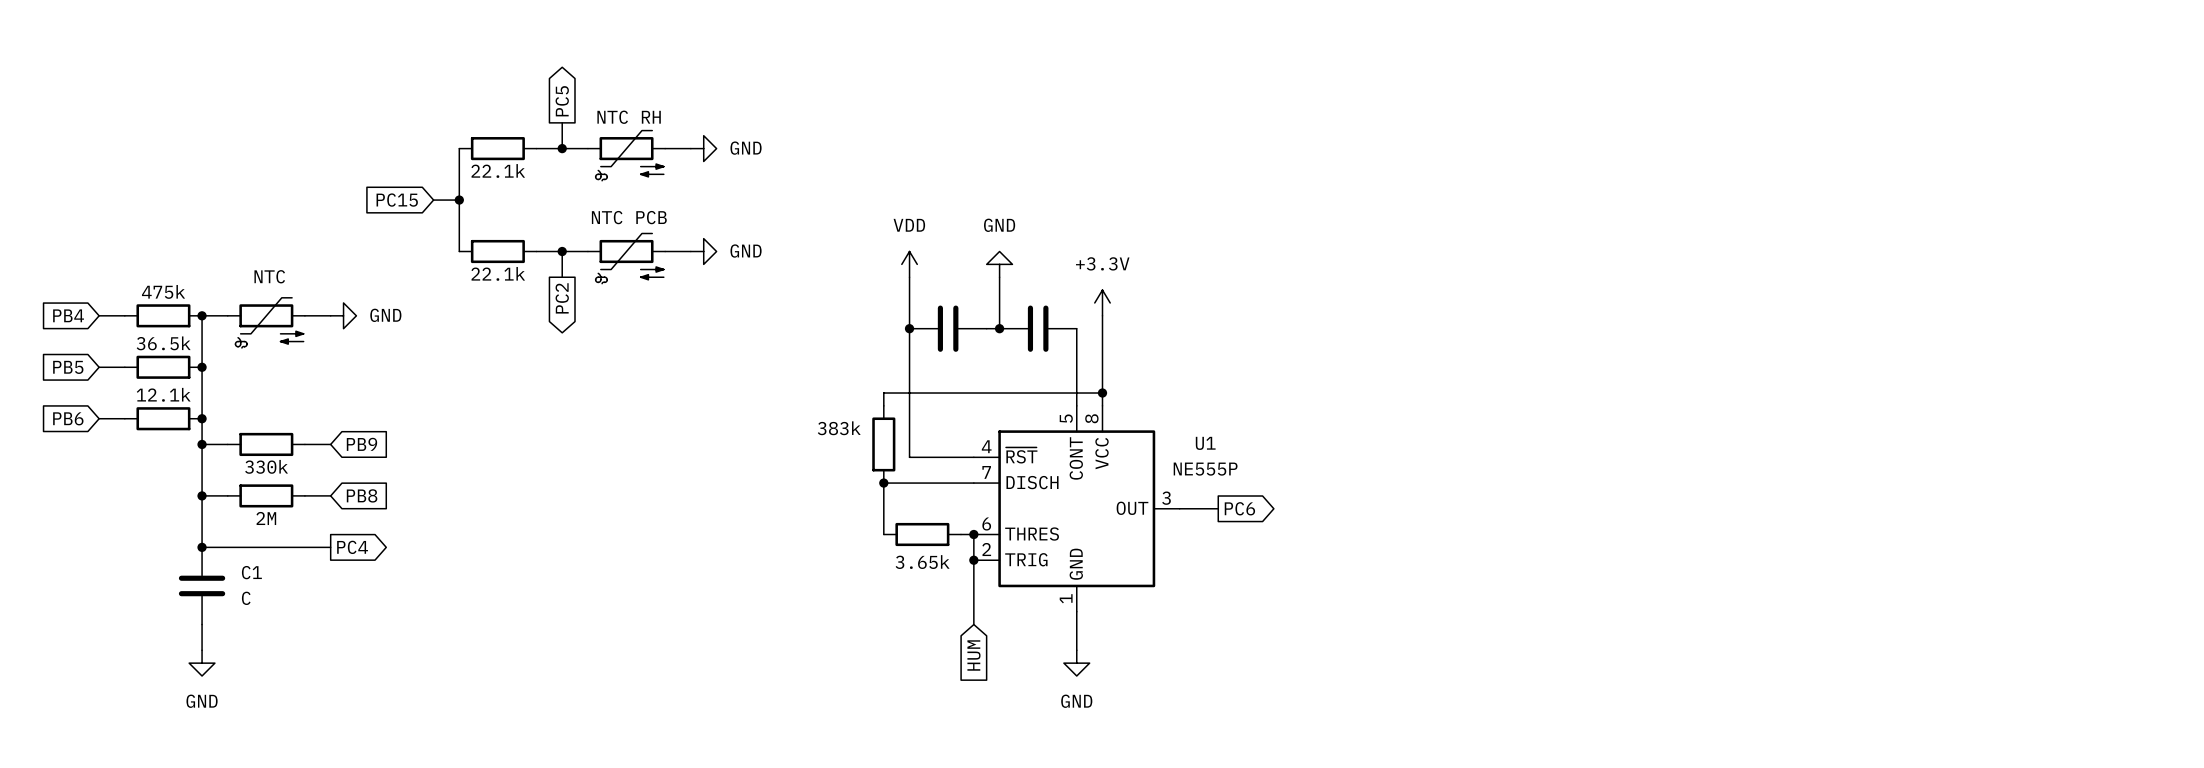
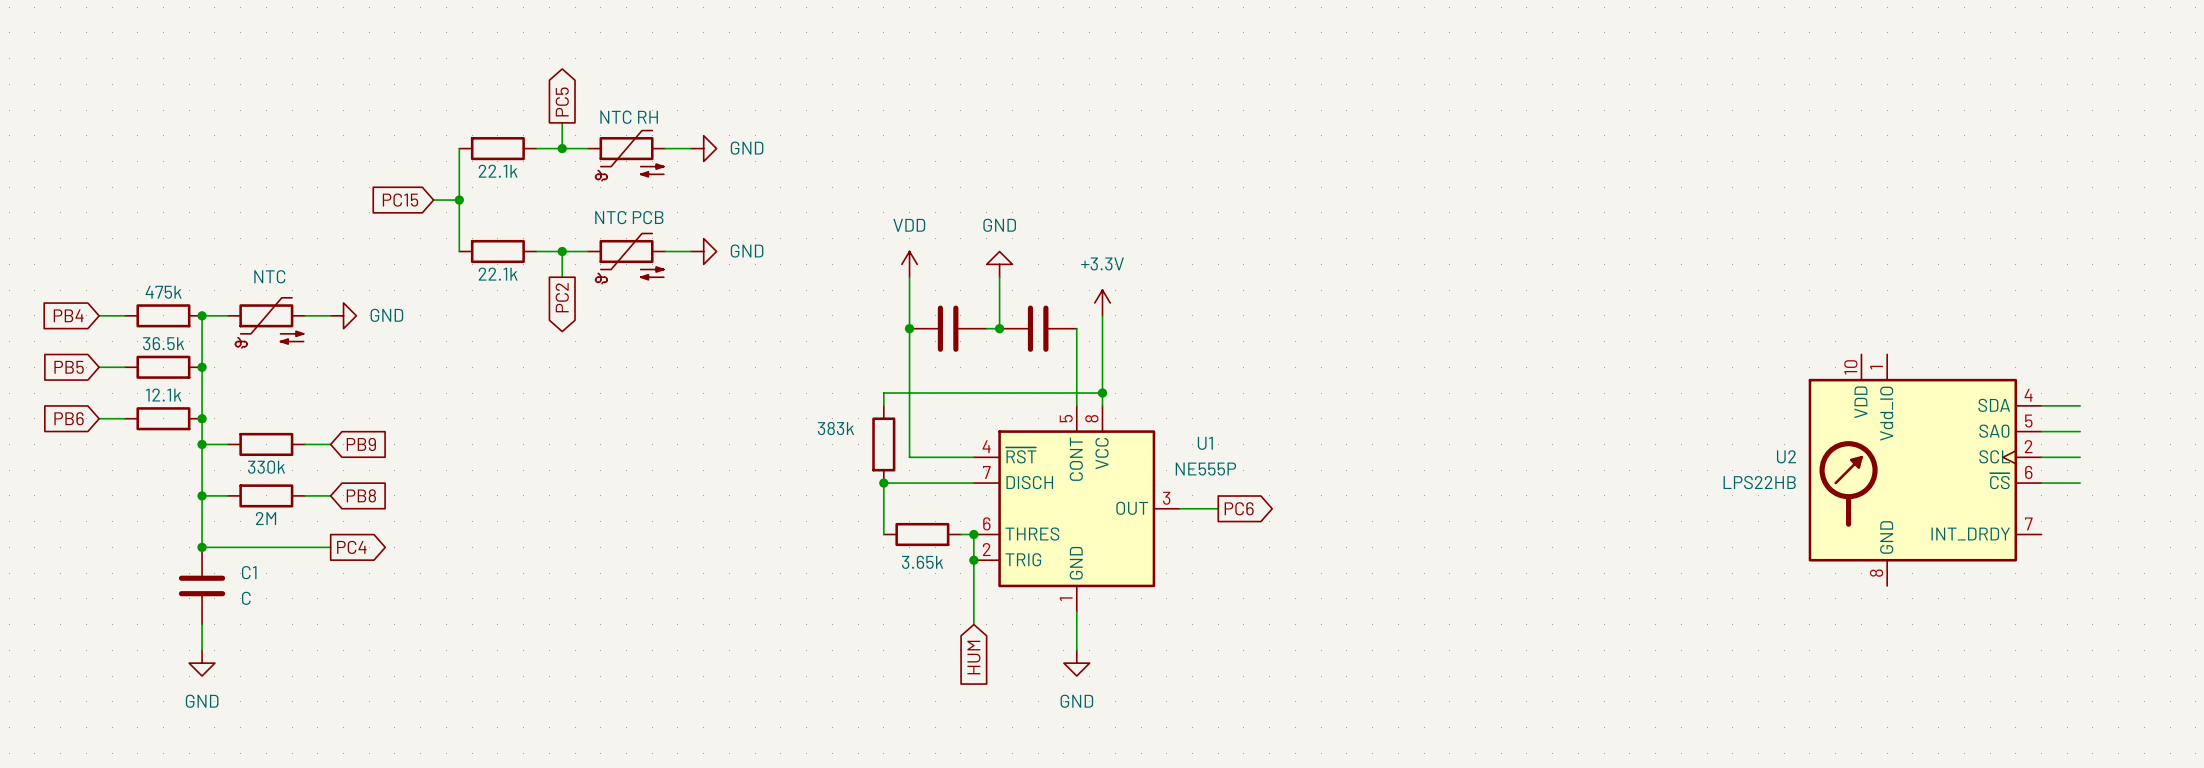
wire: none -> (2041, 405) (2080, 405)
wire: none -> (2041, 431) (2080, 431)
wire: none -> (2041, 457) (2080, 457)
U2: none -> LPS22HB (1925, 470)
wire: none -> (2041, 483) (2080, 483)

